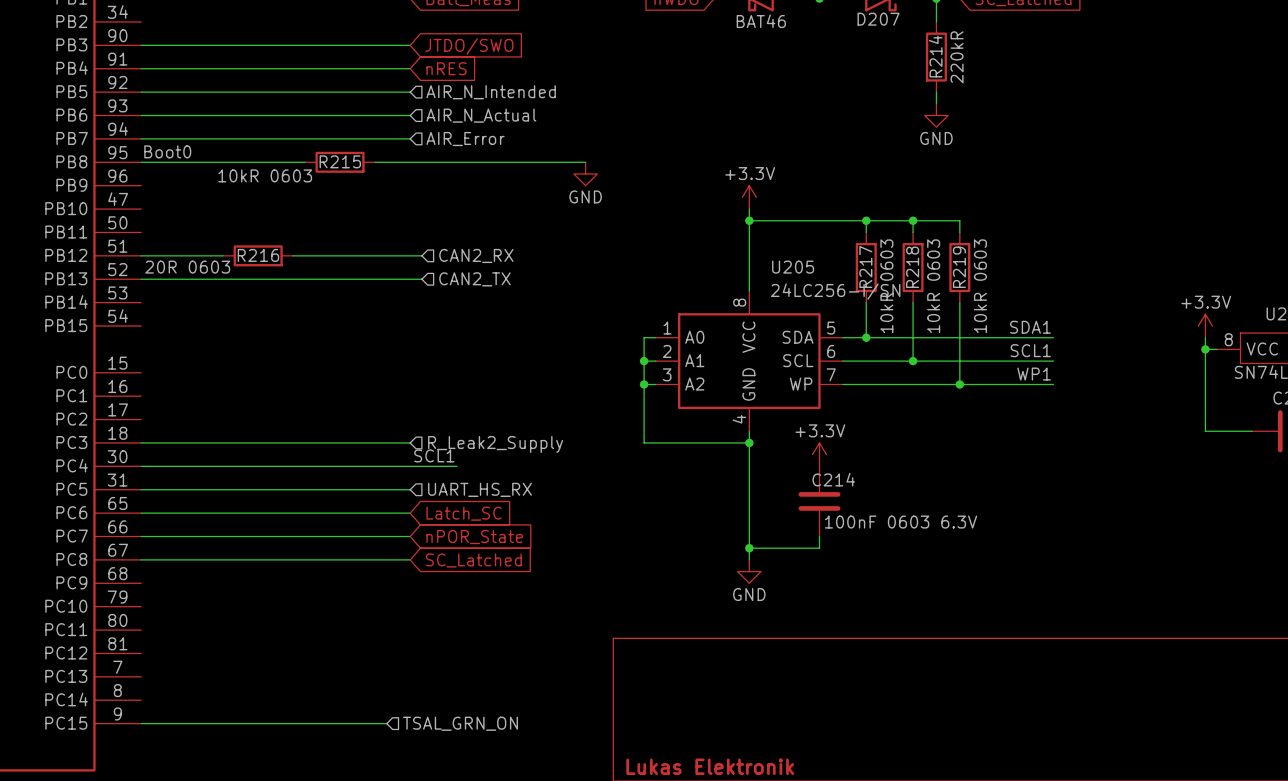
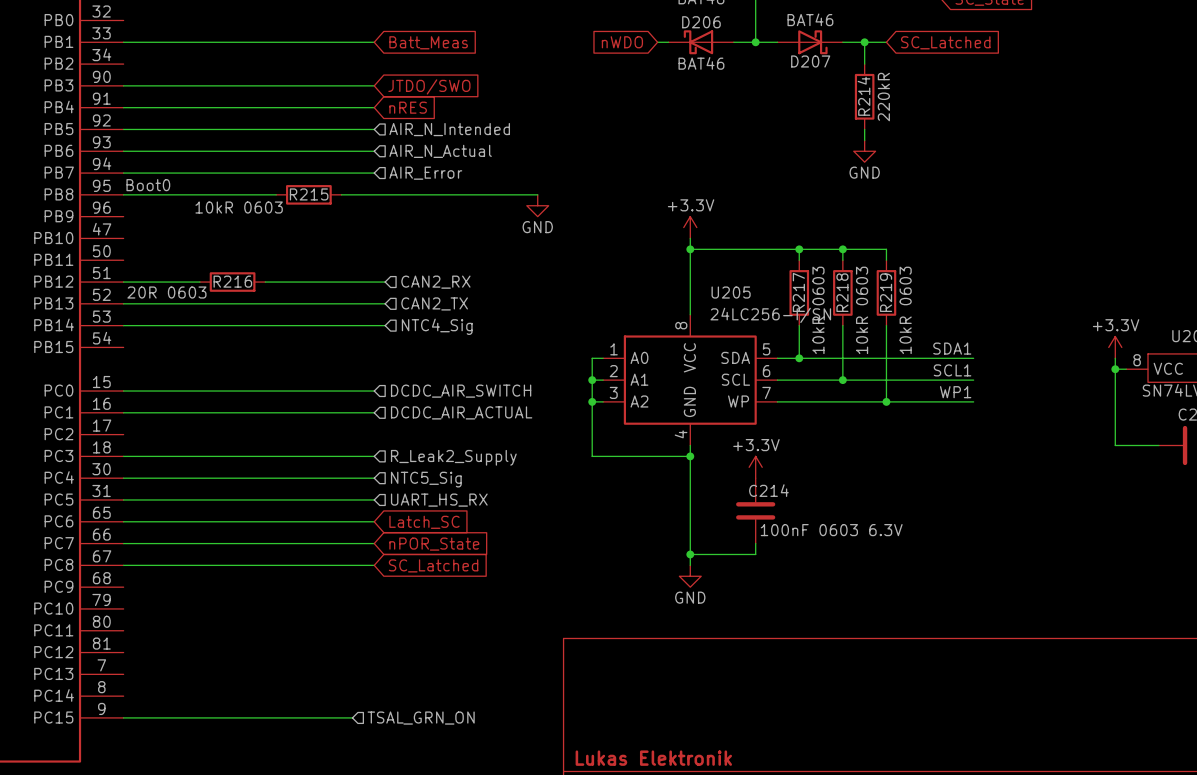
wire: none -> (123, 325) (385, 325)
hierarchical label: none -> NTC4_Sig (437, 326)
wire: none -> (123, 391) (374, 391)
hierarchical label: none -> DCDC_AIR_SWITCH (461, 391)
wire: none -> (123, 412) (374, 412)
hierarchical label: none -> DCDC_AIR_ACTUAL (461, 412)
label: SCL1 (434, 455) -> none
wire: (410, 466) (456, 466) -> none
hierarchical label: none -> NTC5_Sig (426, 479)

